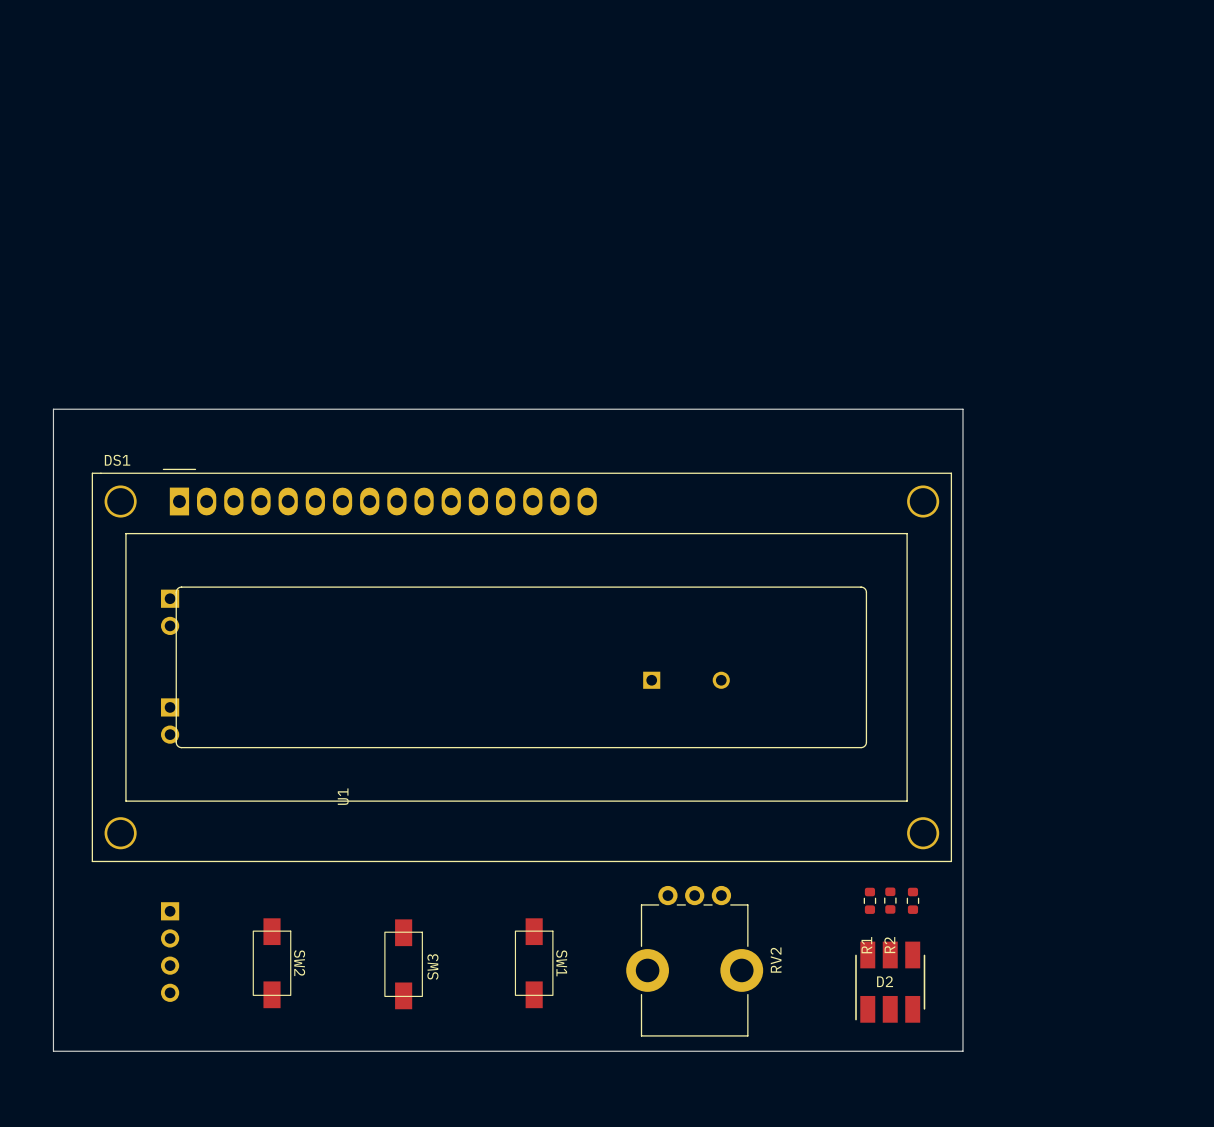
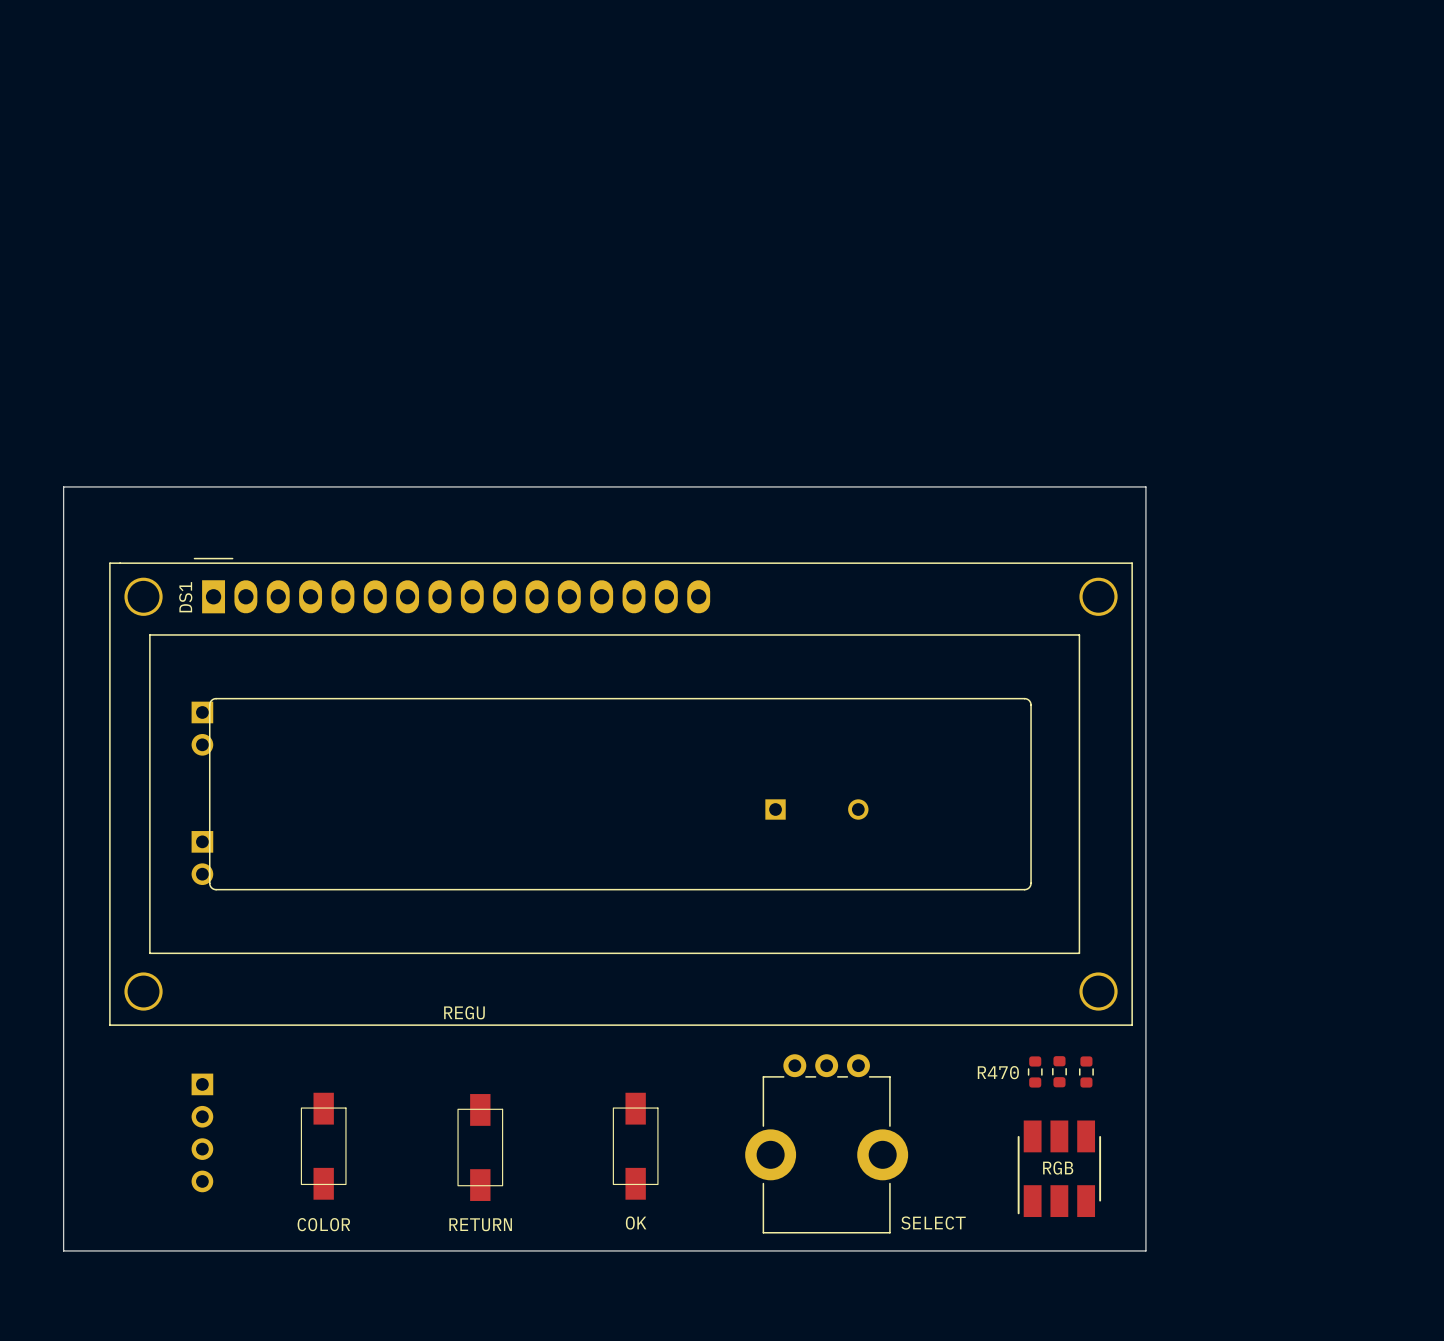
DS1 name rotation: 0° (117, 460) -> 90° counterclockwise (185, 597)
DS1 name position: DS1 (117, 460) -> DS1 (185, 597)
U1: (343, 796) -> none
REGU: none -> (464, 1012)
R1 name: R1 (866, 945) -> R470 (998, 1072)
R2 name: R2 (889, 945) -> none
RV2 name: RV2 (776, 960) -> SELECT (933, 1223)
SW2 name: SW2 (299, 963) -> COLOR (323, 1224)
SW1 name: SW1 (561, 963) -> OK (636, 1223)
SW3 name: SW3 (432, 967) -> RETURN (480, 1224)
D2 name: D2 (885, 981) -> RGB (1058, 1168)

